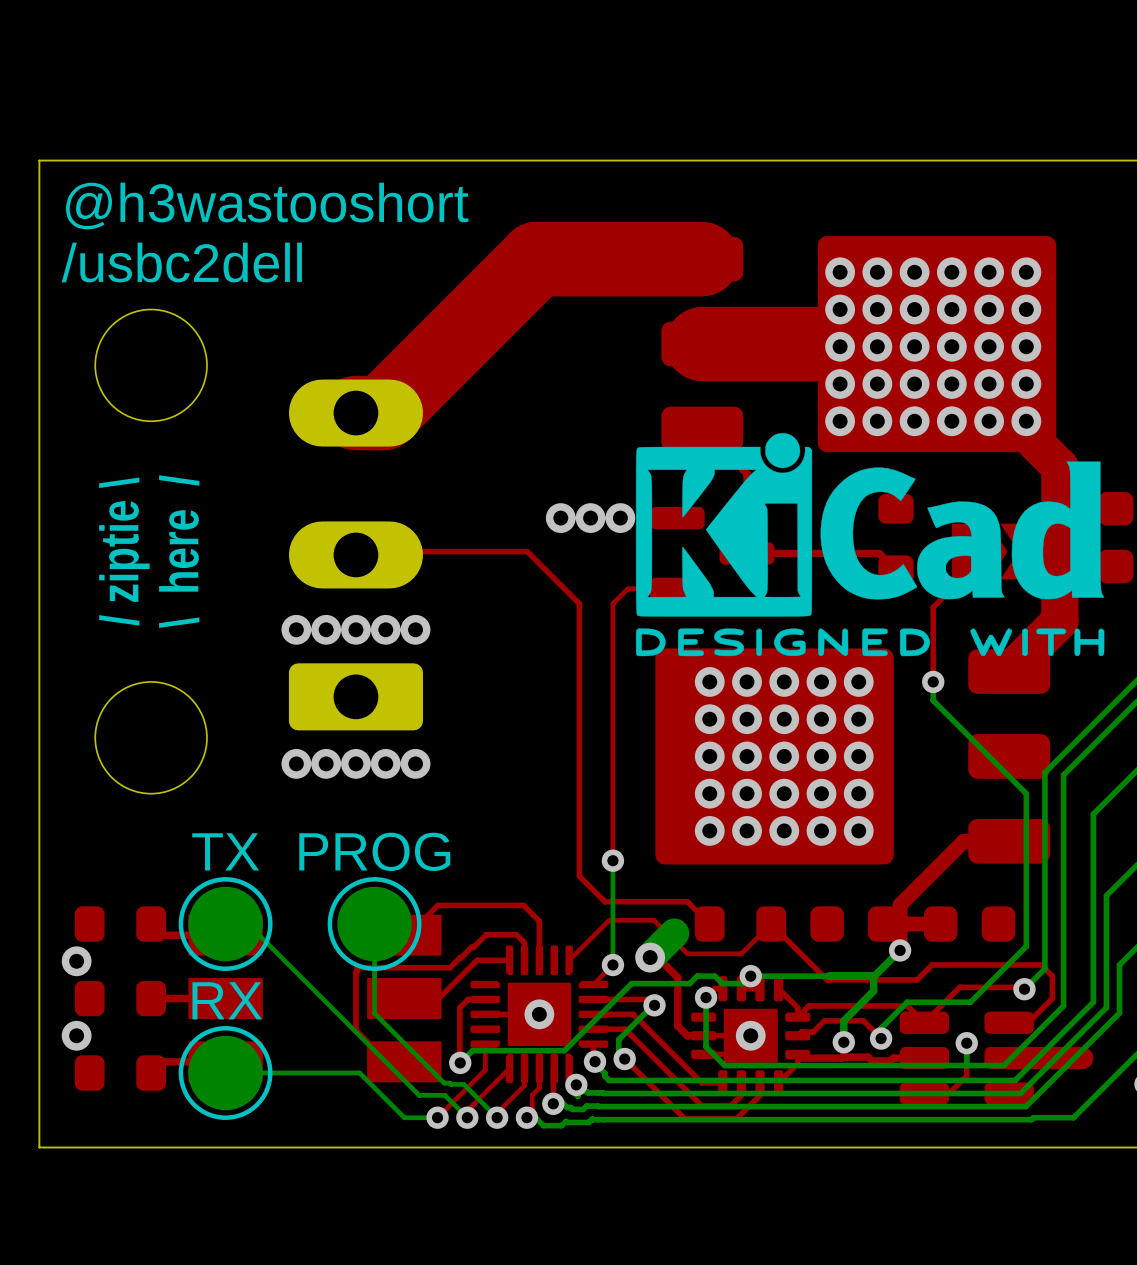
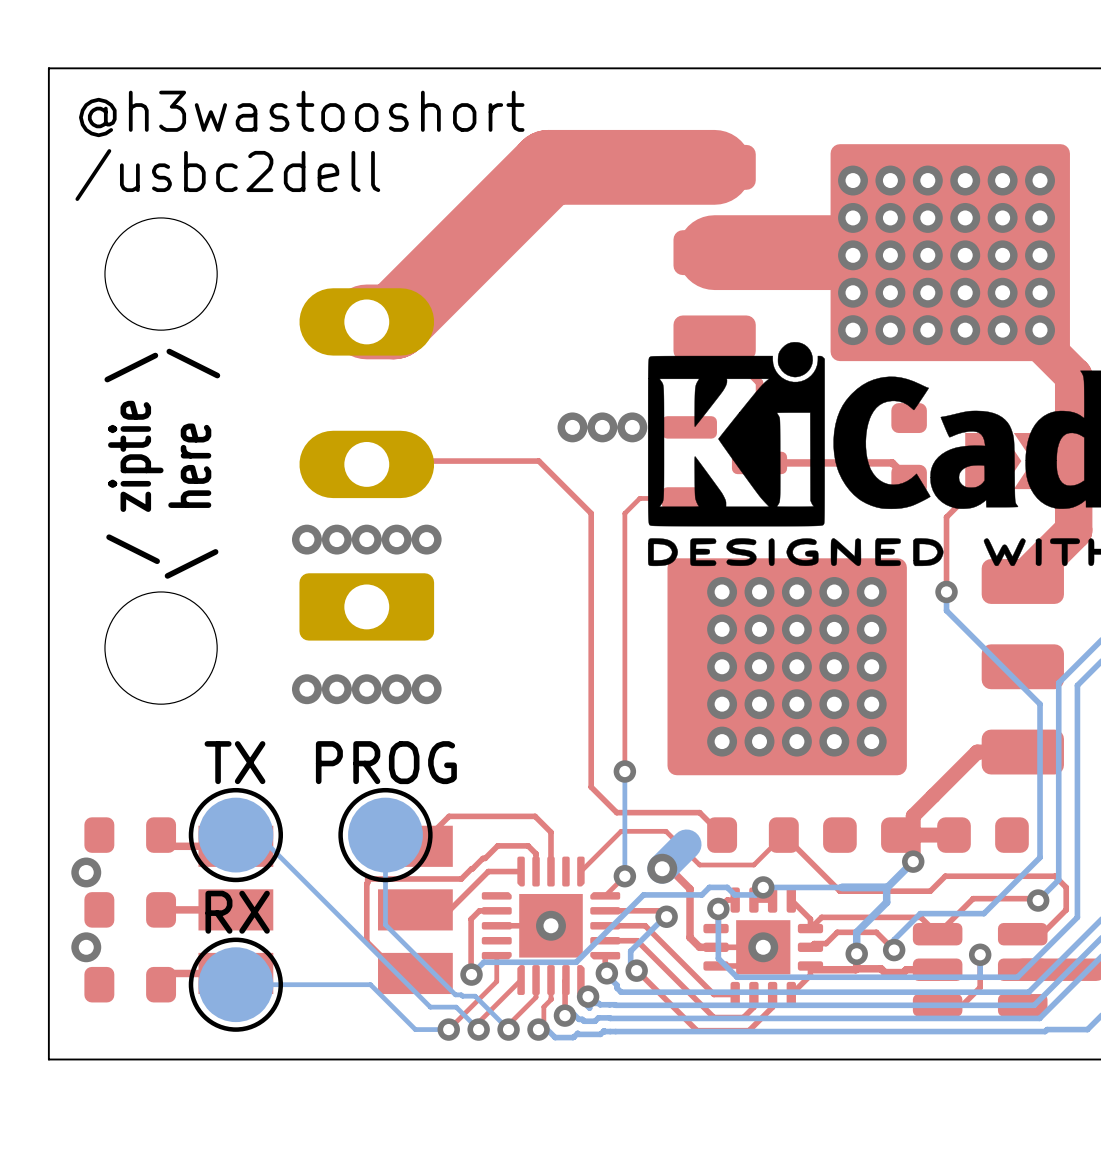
via position: (296, 763) -> (306, 689)
via position: (326, 763) -> (336, 689)
via position: (355, 763) -> (366, 689)
via position: (385, 763) -> (396, 689)
via position: (415, 763) -> (426, 689)

